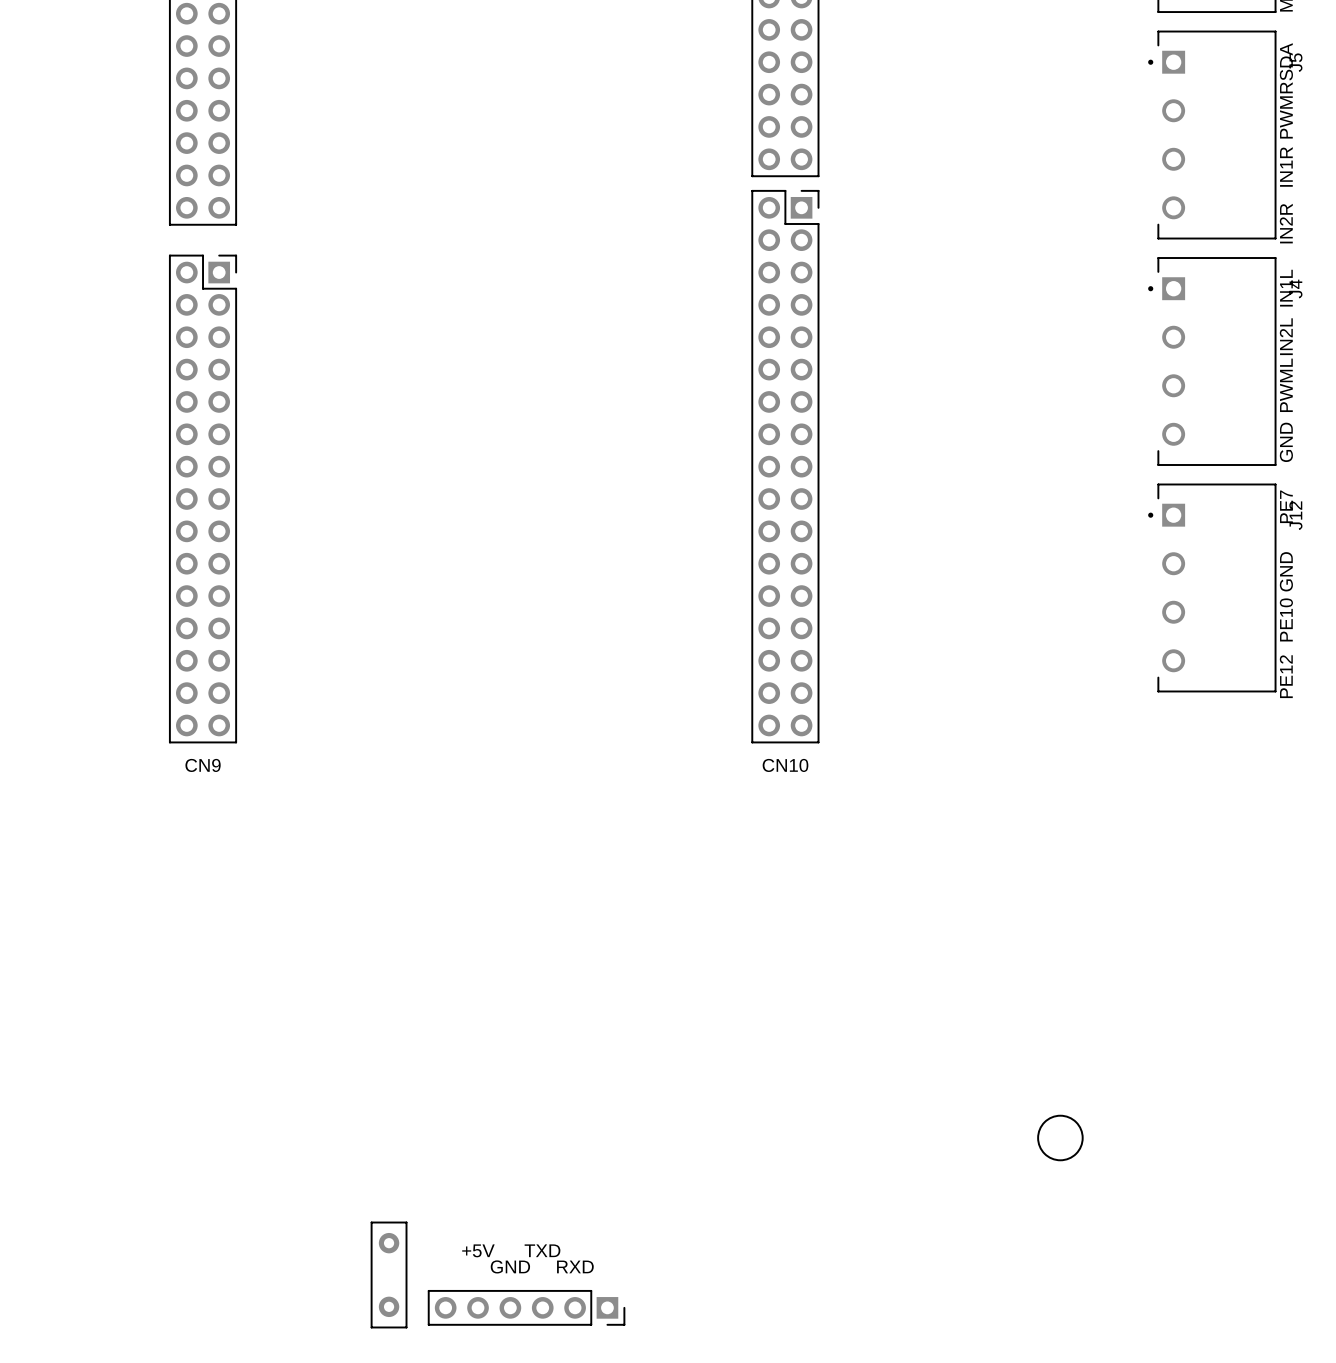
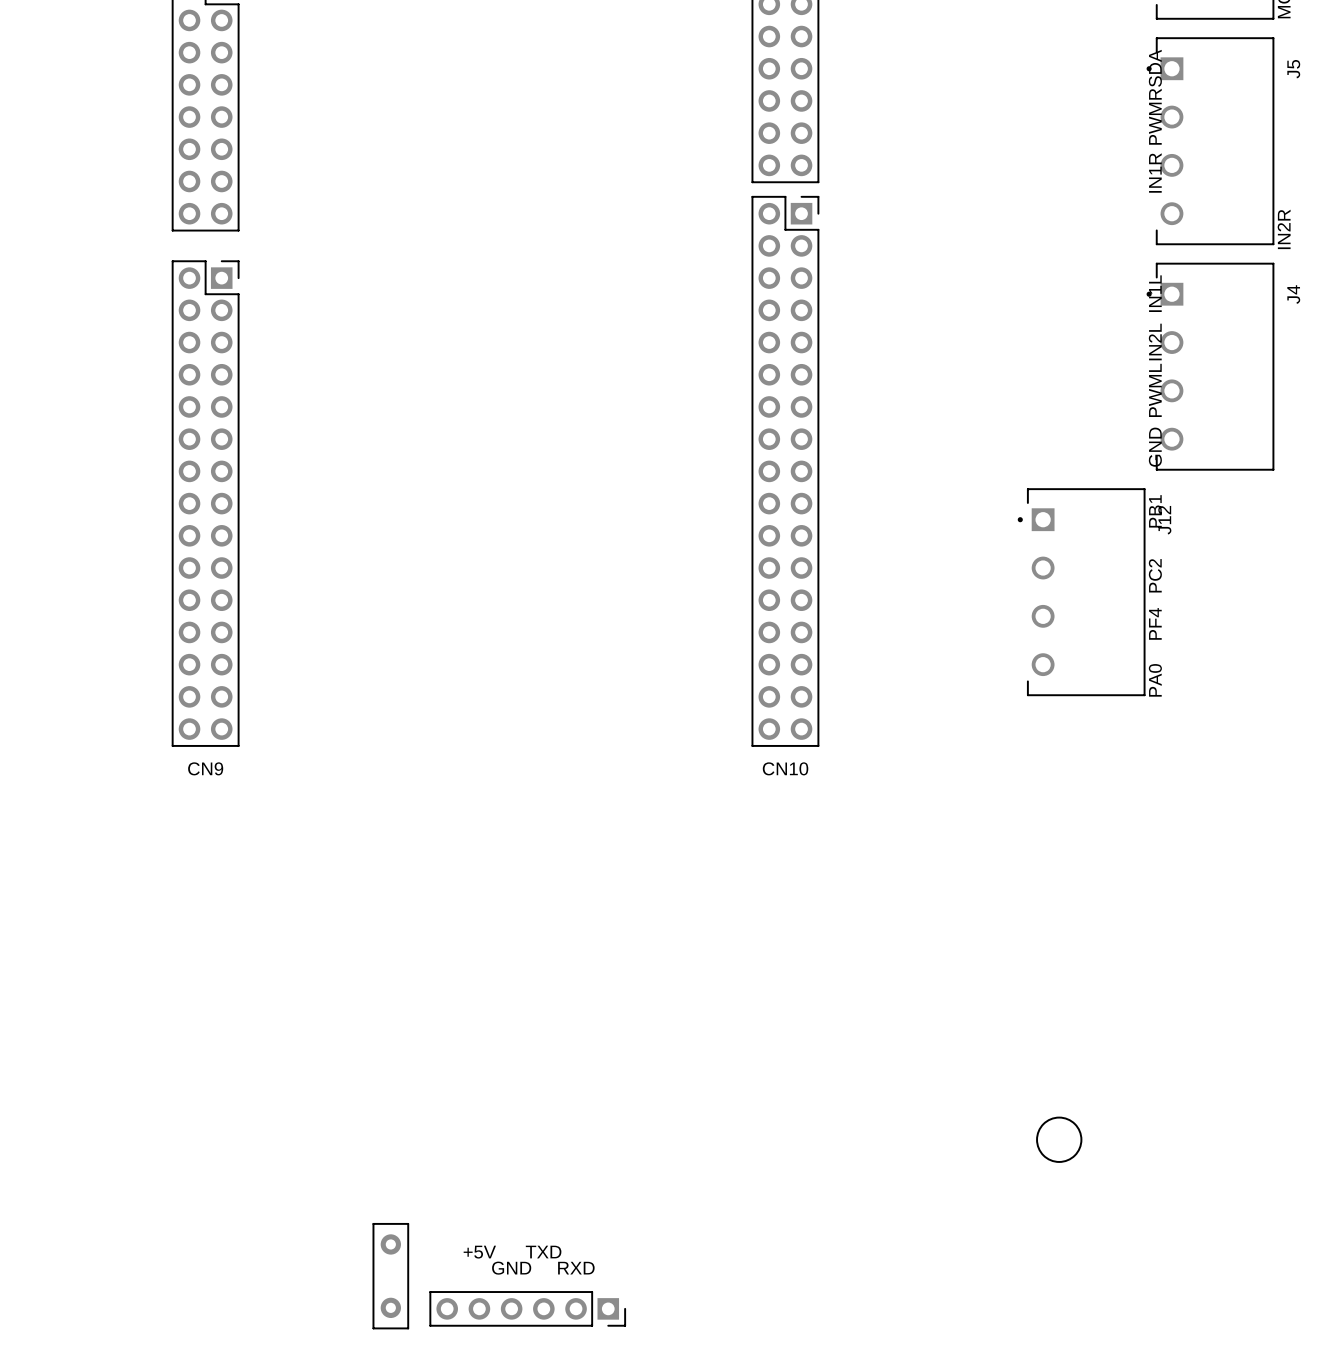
text position: SDA (1286, 61) -> SDA (1155, 68)
text position: PWMR (1286, 110) -> PWMR (1155, 116)
text position: IN1R (1286, 166) -> IN1R (1155, 173)
text position: IN1L (1286, 288) -> IN1L (1155, 293)
text position: IN2L (1286, 336) -> IN2L (1155, 342)
text position: PWML (1286, 385) -> PWML (1155, 390)
text: none -> GND (1155, 447)
text: GND (1286, 442) -> none
text: none -> PB1 (1155, 511)
text: PE7 (1286, 506) -> none
text: none -> PC2 (1155, 575)
text: GND (1286, 571) -> none
J12 position: (1212, 587) -> (1081, 592)
text: none -> PF4 (1155, 623)
text: PE10 (1286, 619) -> none
text: none -> PA0 (1155, 680)
text: PE12 (1286, 676) -> none

